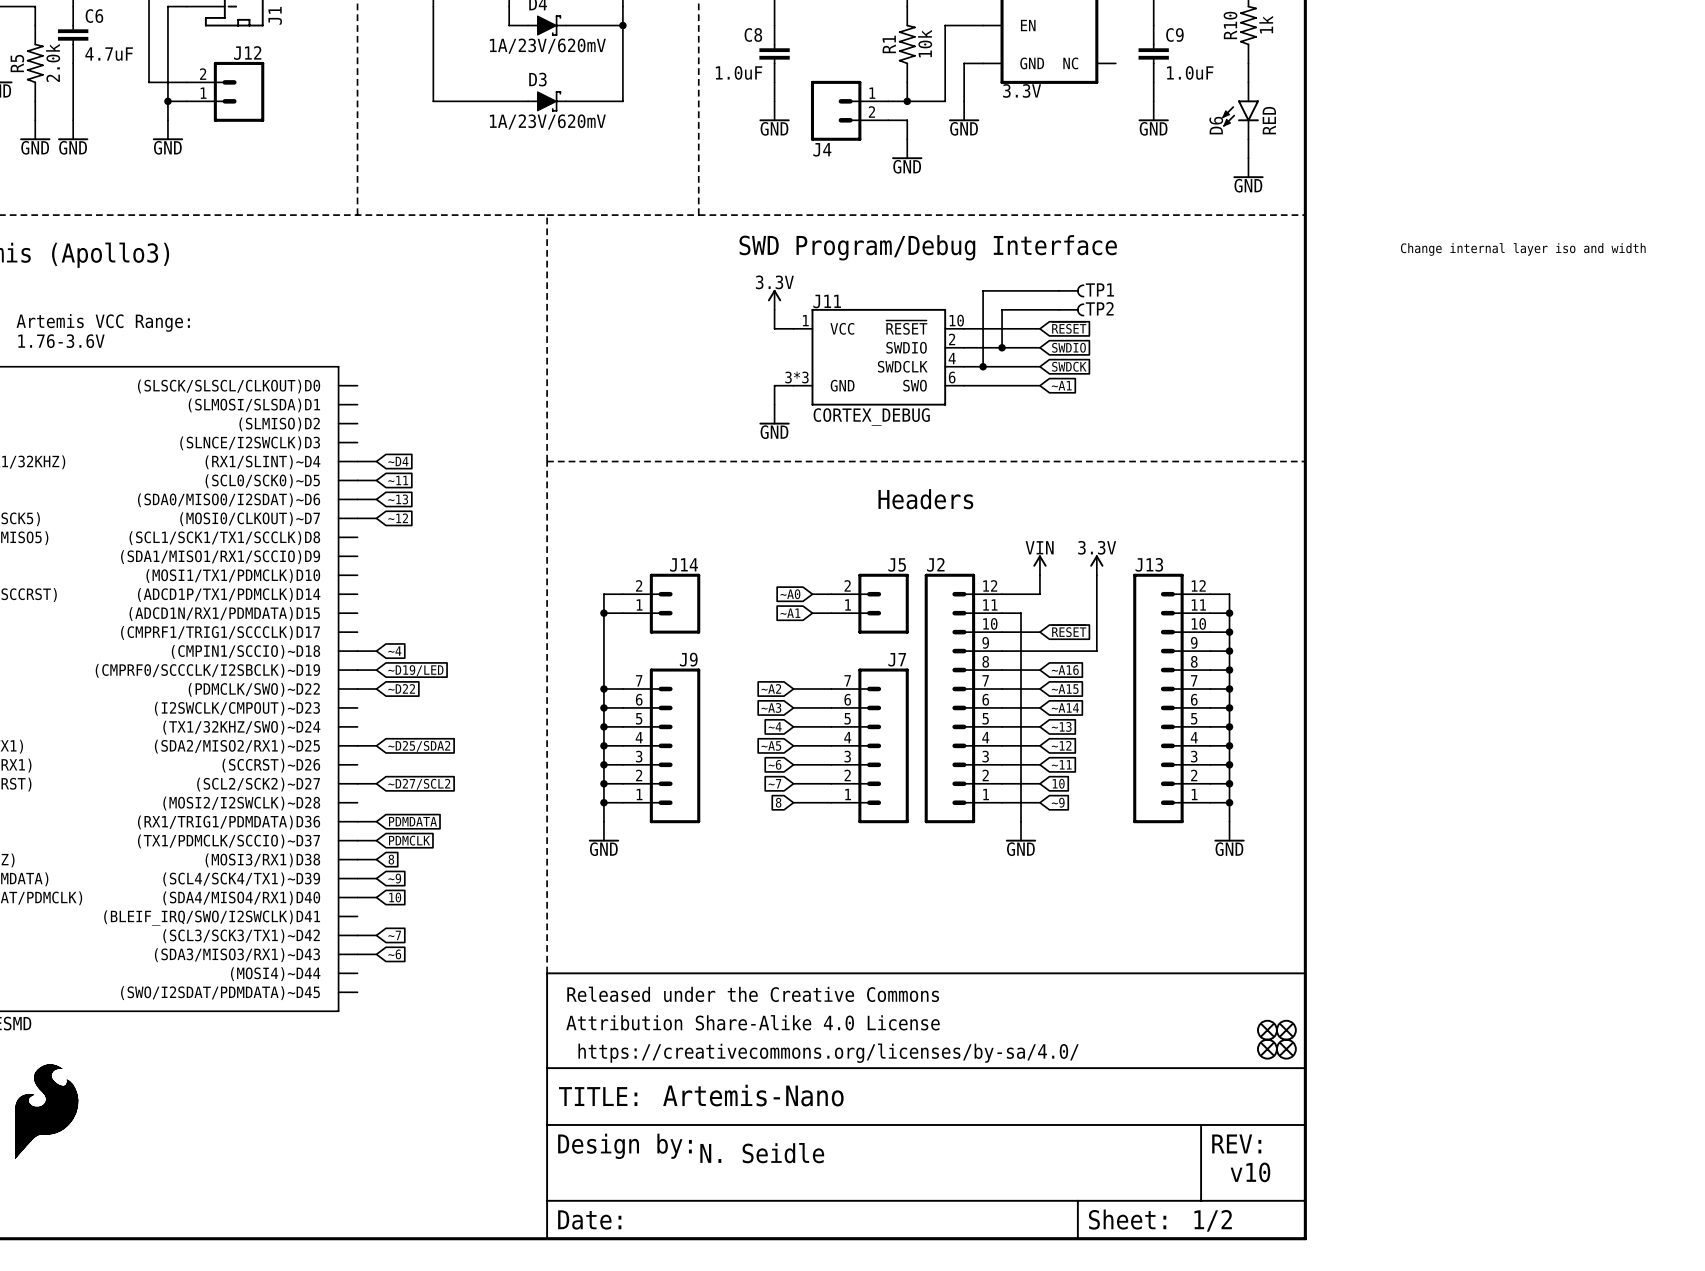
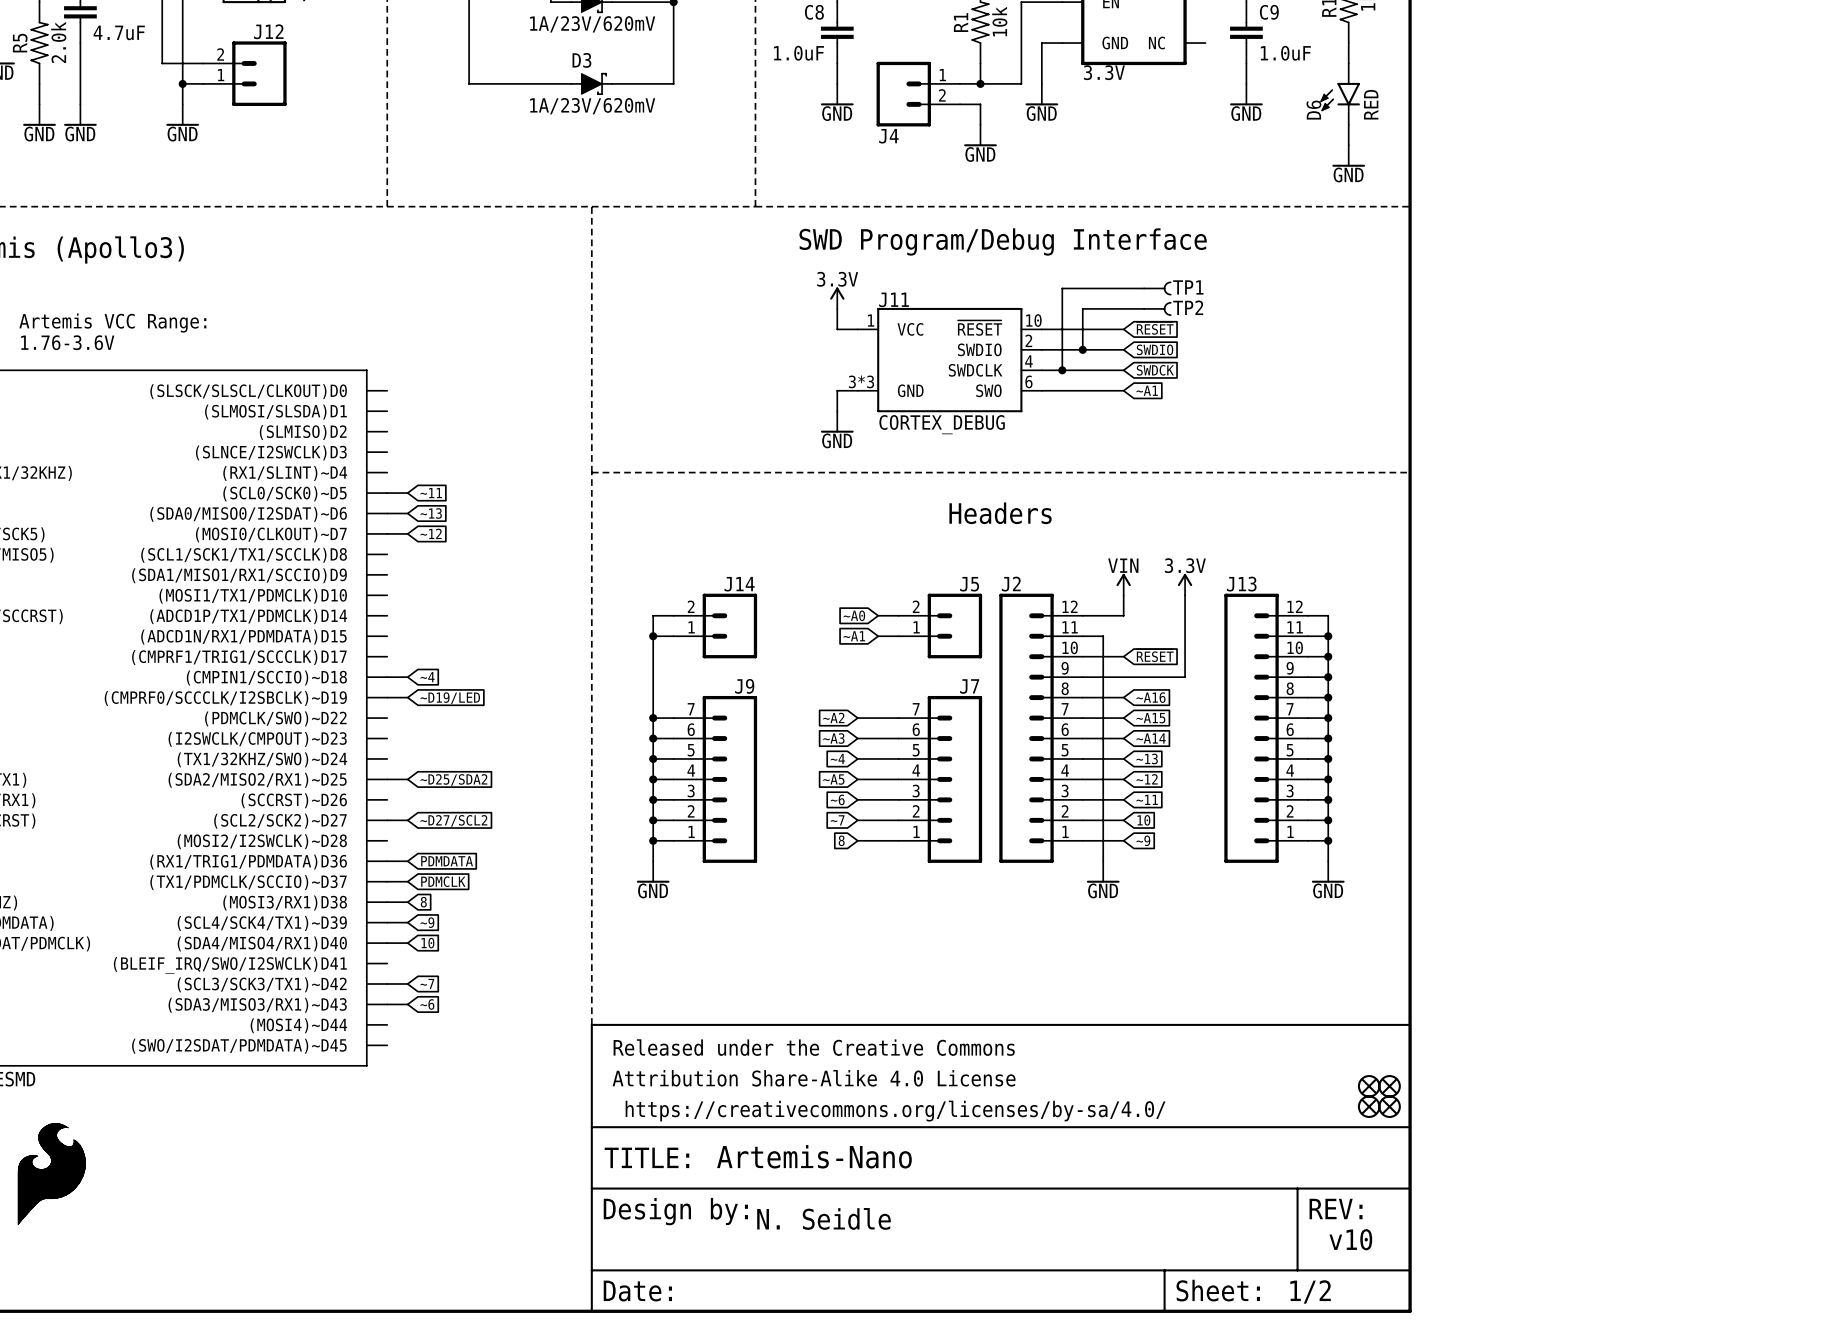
text: Change internal layer iso and width (1523, 249) -> none
wire: (357, 461) (376, 461) -> none
global label: ~D4 (398, 461) -> none
global label: ~D22 (401, 688) -> none
wire: (357, 689) (376, 689) -> none

